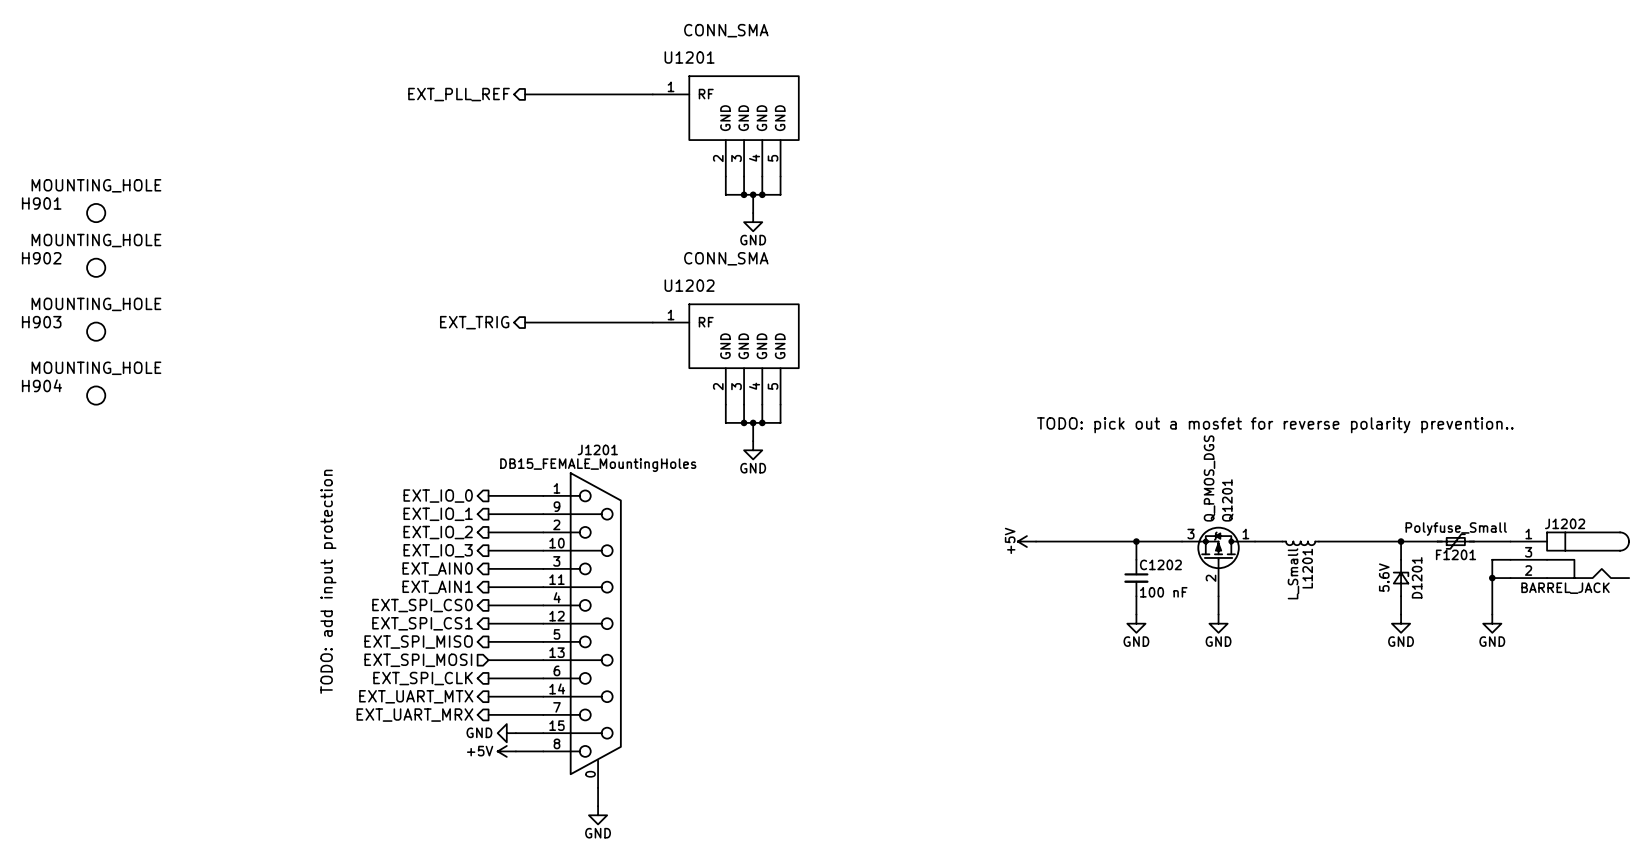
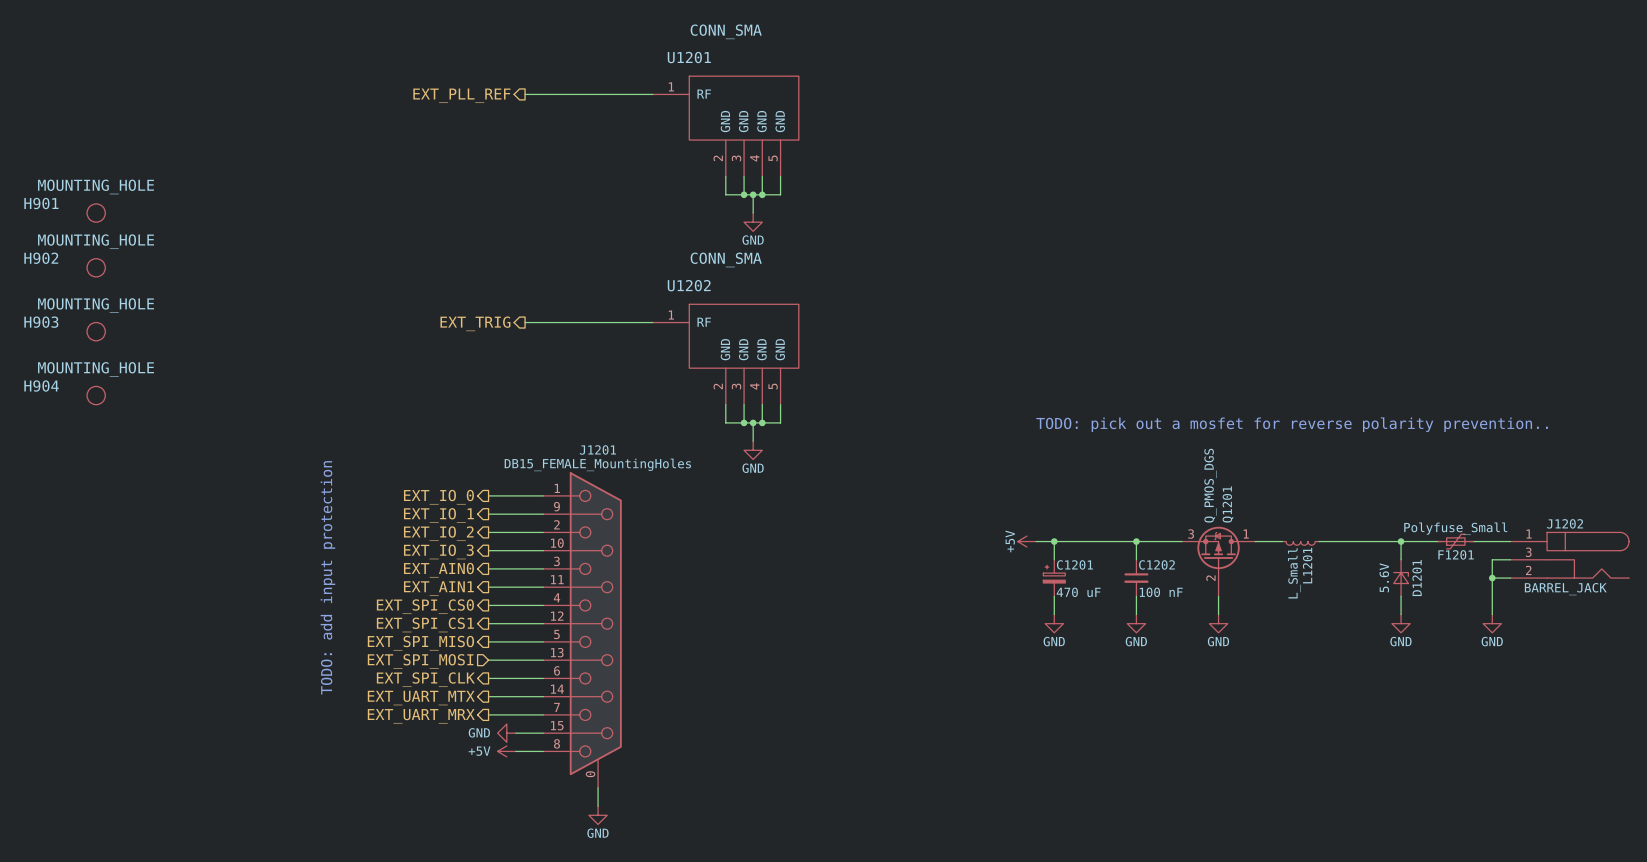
wire: none -> (1054, 541) (1054, 559)
junction: none -> (1054, 541)
C1201: none -> 470 uF (1054, 578)
wire: none -> (1054, 596) (1054, 614)
power symbol: none -> GND (1054, 623)

